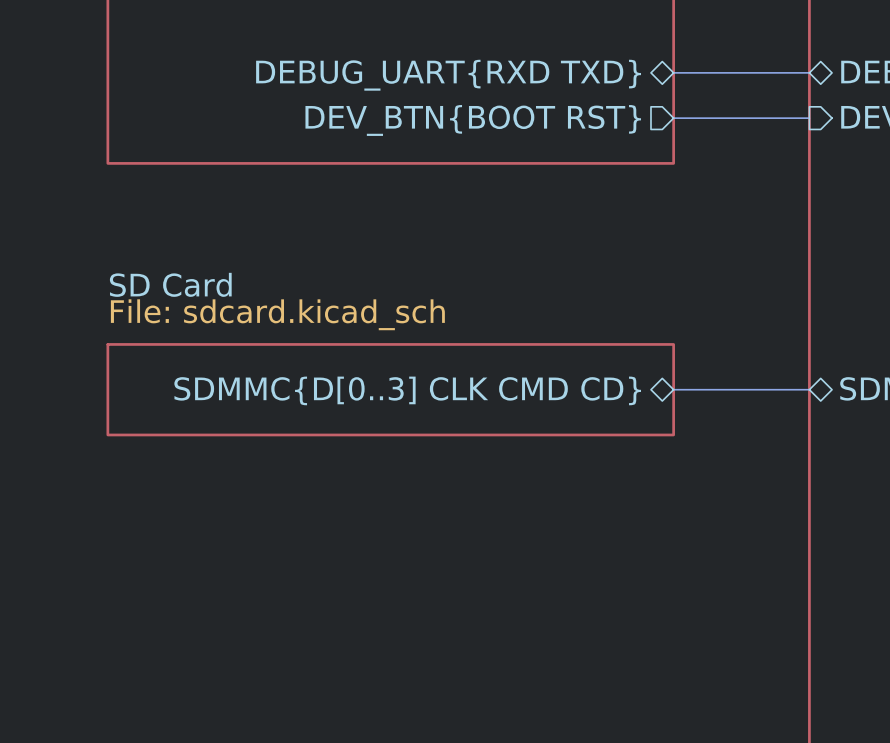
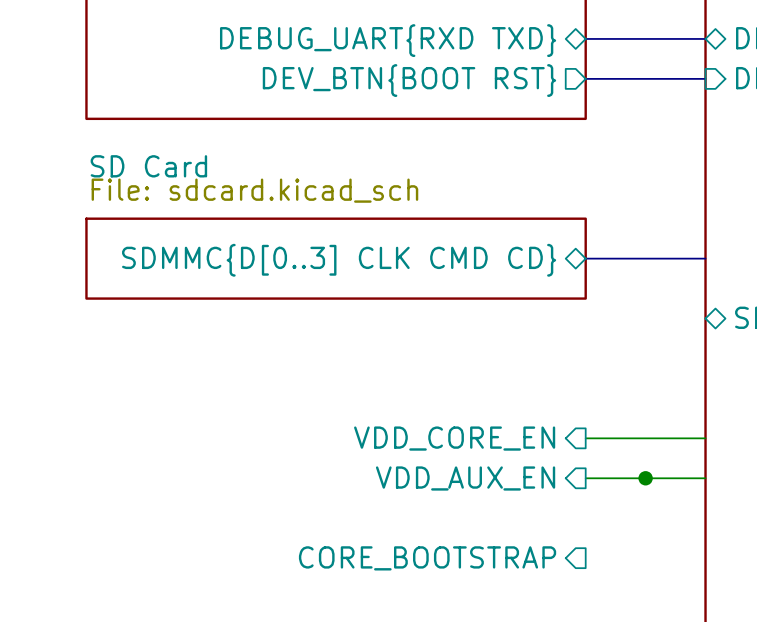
sheet SD Card position: (390, 389) -> (336, 258)
bus: (673, 389) (809, 389) -> (585, 258) (705, 258)
sheet pin position: SDMMC{D[0..3] CLK CMD CD} (407, 390) -> SDMMC{D[0..3] CLK CMD CD} (339, 260)
wire: none -> (585, 438) (705, 438)
sheet pin: none -> VDD_CORE_EN (454, 438)
wire: none -> (585, 478) (705, 478)
junction: none -> (645, 478)
sheet pin: none -> VDD_AUX_EN (465, 478)
sheet pin: none -> CORE_BOOTSTRAP (427, 558)

